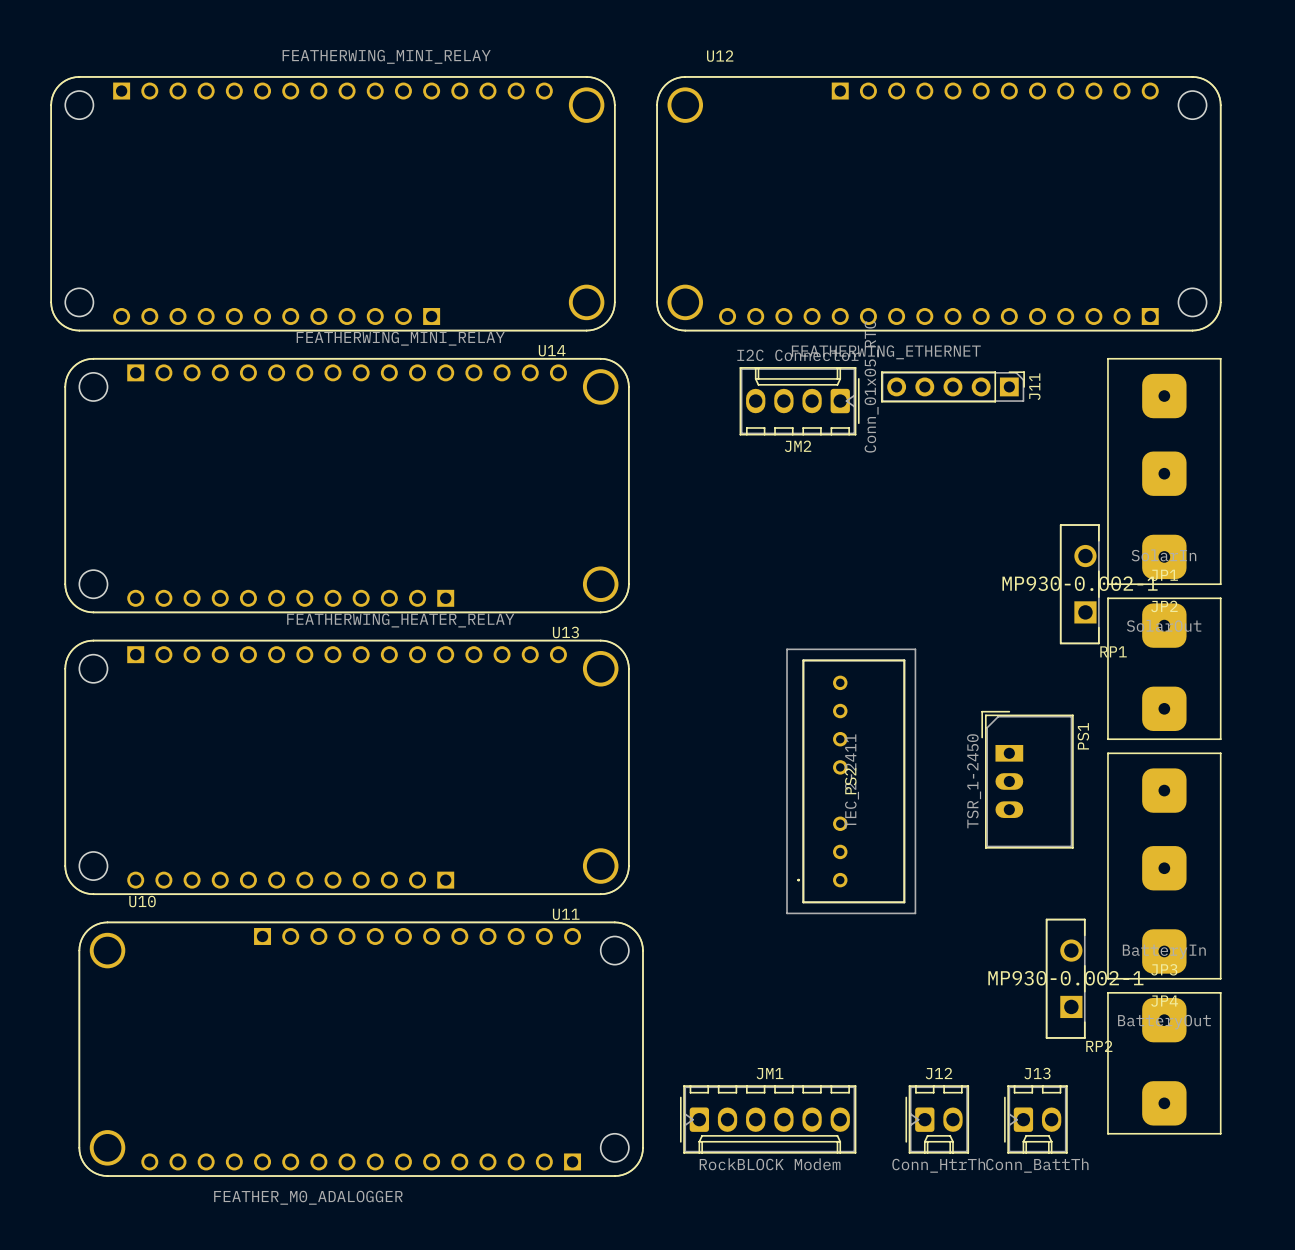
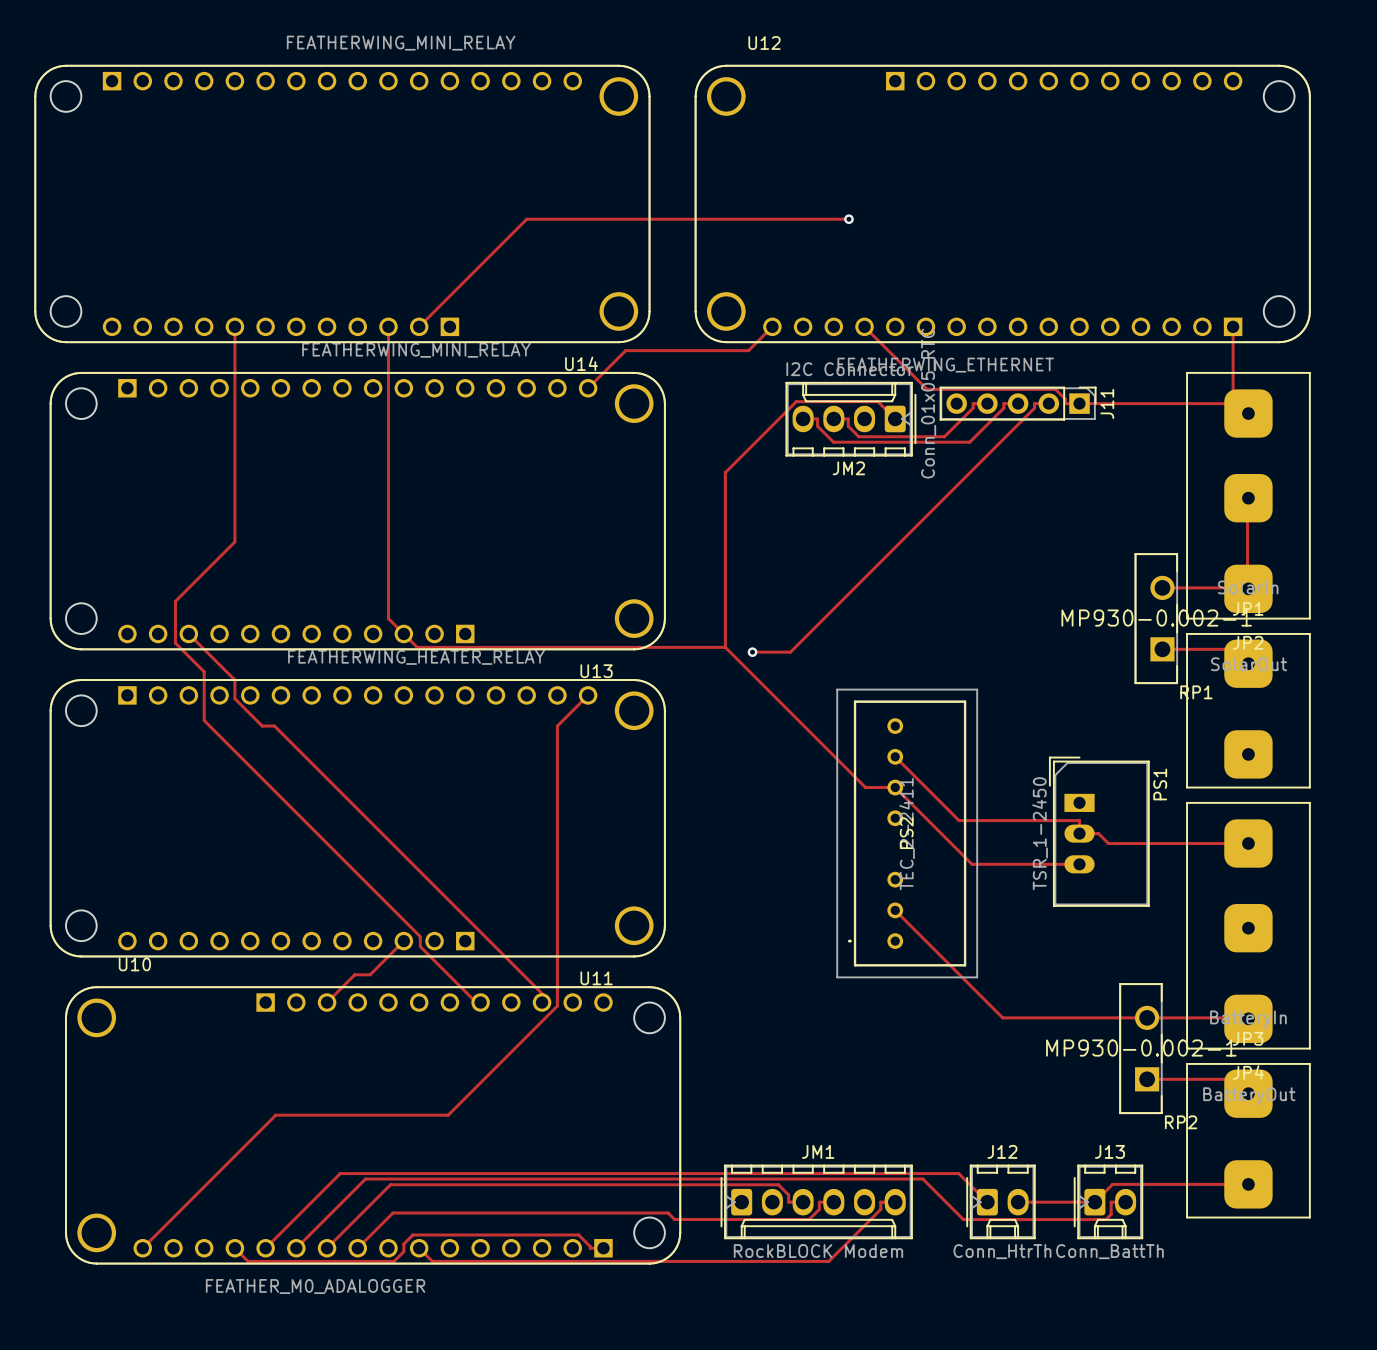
track: none -> (848, 219) (526, 219) (419, 326)
via: none -> (848, 219)
track: none -> (234, 326) (234, 541) (175, 601) (175, 643) (204, 671) (204, 720) (420, 936) (420, 946) (476, 1002) (480, 1002)
track: none -> (388, 326) (388, 618) (417, 647) (725, 647)
track: none -> (772, 326) (748, 350) (625, 350) (588, 388)
track: none -> (864, 326) (927, 389) (1055, 389) (1065, 399) (1065, 403) (1238, 403) (1248, 413)
track: none -> (1233, 326) (1233, 403)
track: none -> (987, 403) (973, 403) (973, 408) (944, 436) (858, 436) (848, 426) (848, 418) (833, 418)
track: none -> (1018, 403) (1003, 403) (1003, 408) (969, 442) (833, 442) (817, 426) (817, 418) (803, 418)
track: none -> (1048, 403) (1034, 403) (1034, 408) (790, 652) (752, 652)
track: none -> (895, 418) (877, 401) (796, 401) (725, 472) (725, 647)
track: none -> (1248, 498) (1247, 587)
track: none -> (1162, 587) (1247, 587)
track: none -> (188, 633) (234, 680) (234, 698) (262, 726) (274, 726) (542, 993) (542, 1002)
track: none -> (725, 647) (865, 787) (895, 787) (972, 864) (1079, 864)
track: none -> (1162, 649) (1234, 649) (1248, 663)
via: none -> (752, 652)
track: none -> (588, 695) (557, 726) (557, 1006) (448, 1115) (275, 1115) (142, 1248)
track: none -> (895, 756) (959, 820) (1079, 820) (1079, 833) (1098, 833) (1108, 843) (1248, 843)
track: none -> (895, 910) (1002, 1017) (1248, 1018)
track: none -> (403, 941) (370, 974) (354, 974) (327, 1002)
track: none -> (1147, 1079) (1234, 1079) (1248, 1093)
track: none -> (1248, 1184) (1112, 1184) (1094, 1202) (1018, 1202)
track: none -> (803, 1202) (788, 1202) (788, 1194) (778, 1184) (390, 1184) (327, 1248)
track: none -> (833, 1202) (819, 1202) (819, 1209) (809, 1219) (674, 1219) (668, 1213) (393, 1213) (357, 1248)
track: none -> (895, 1202) (880, 1202) (880, 1209) (828, 1261) (432, 1261) (419, 1248)
track: none -> (987, 1202) (958, 1173) (340, 1173) (265, 1248)
track: none -> (1125, 1202) (1111, 1202) (1111, 1214) (1105, 1219) (963, 1219) (922, 1179) (365, 1179) (296, 1248)
track: none -> (234, 1248) (248, 1261) (394, 1261) (403, 1251) (403, 1244) (412, 1235) (578, 1235) (590, 1248) (603, 1248)

